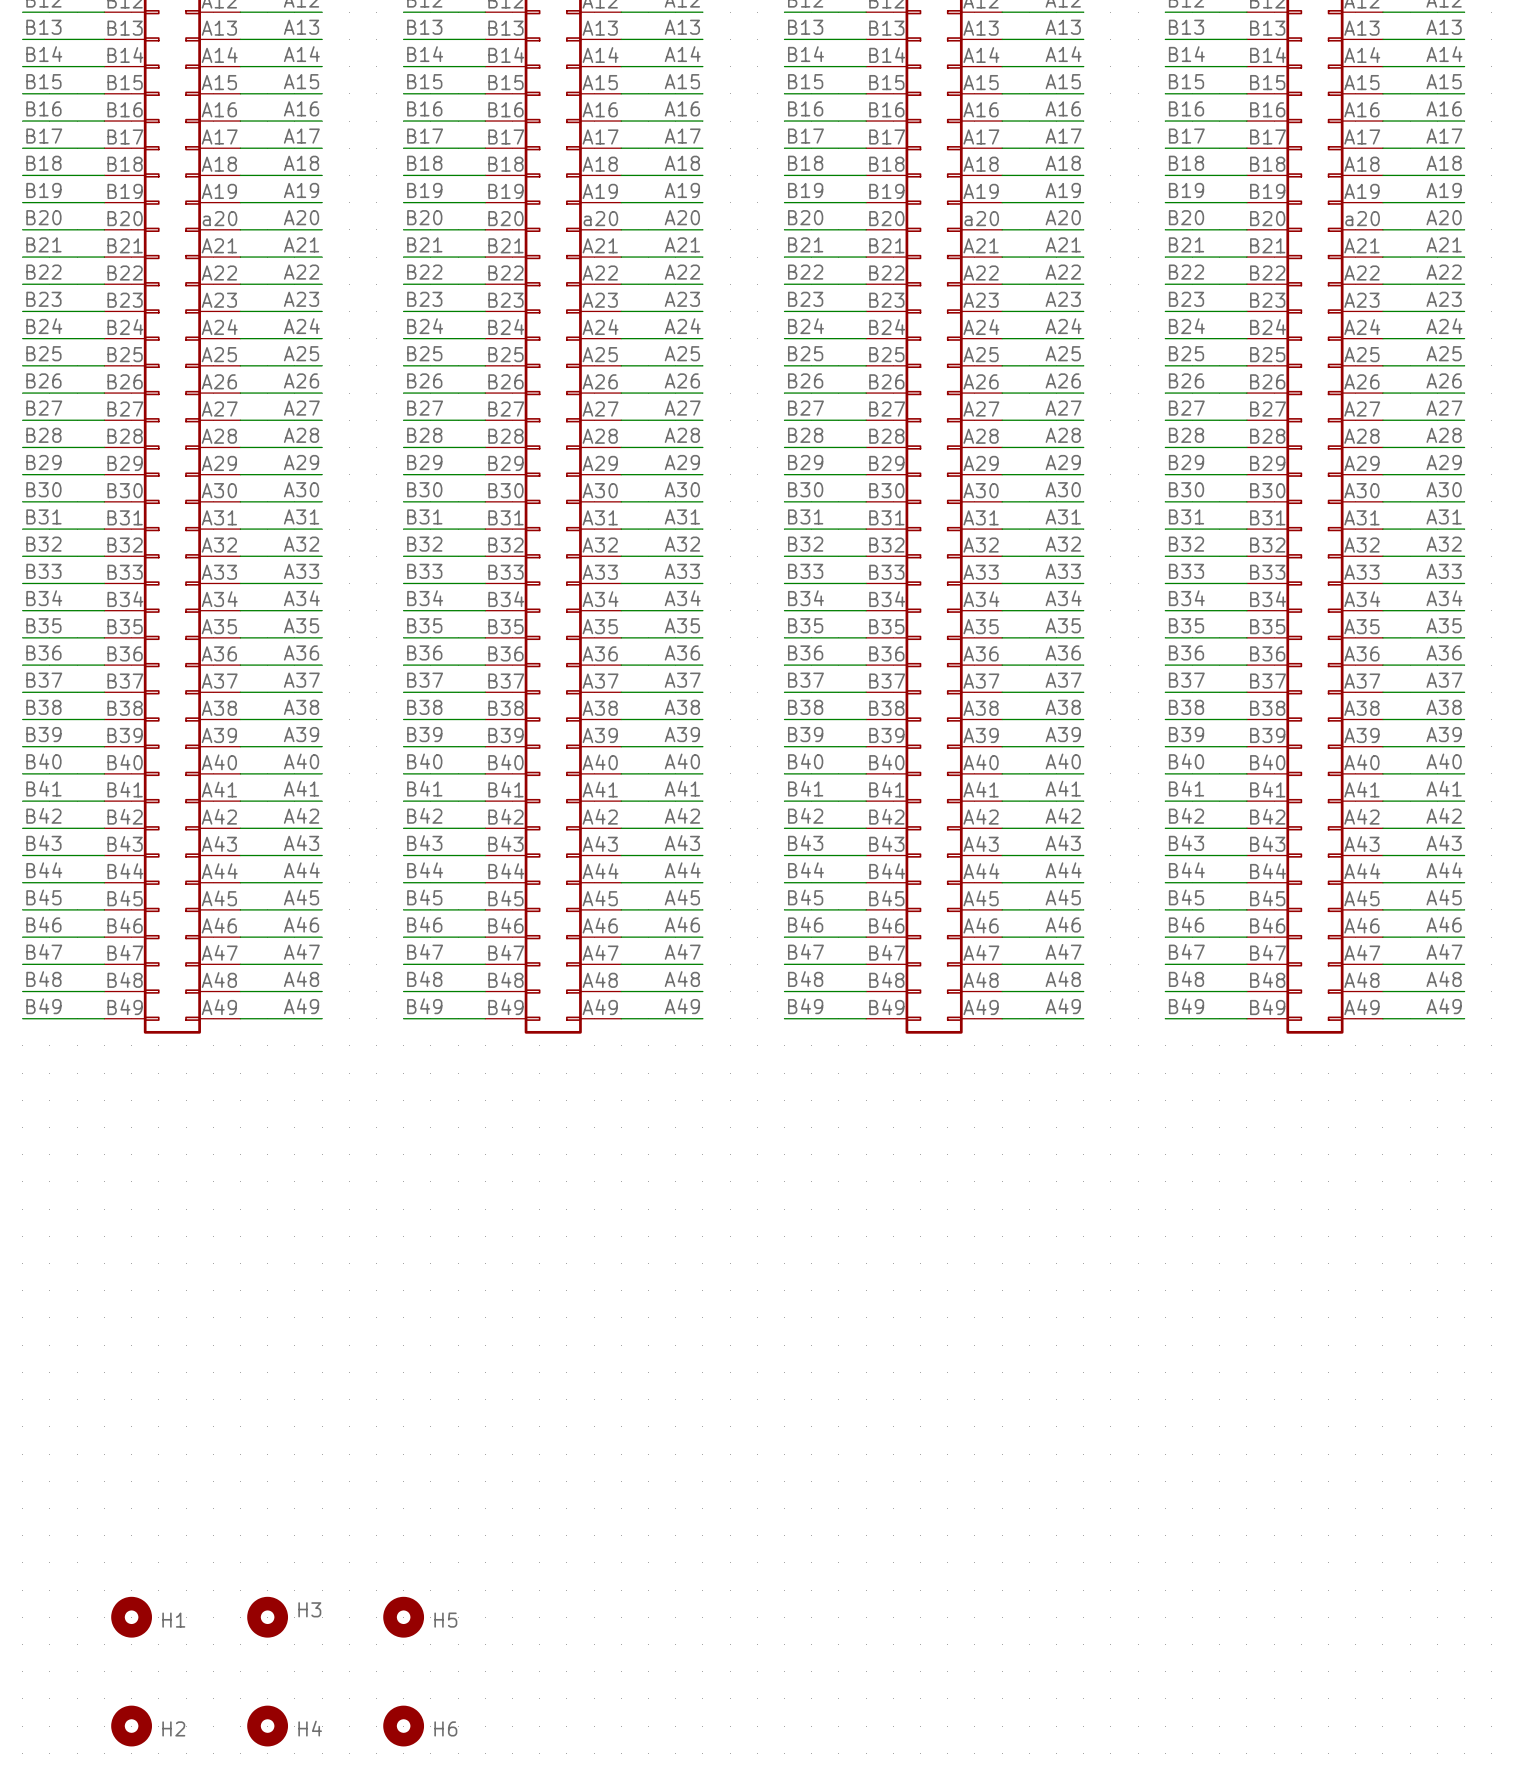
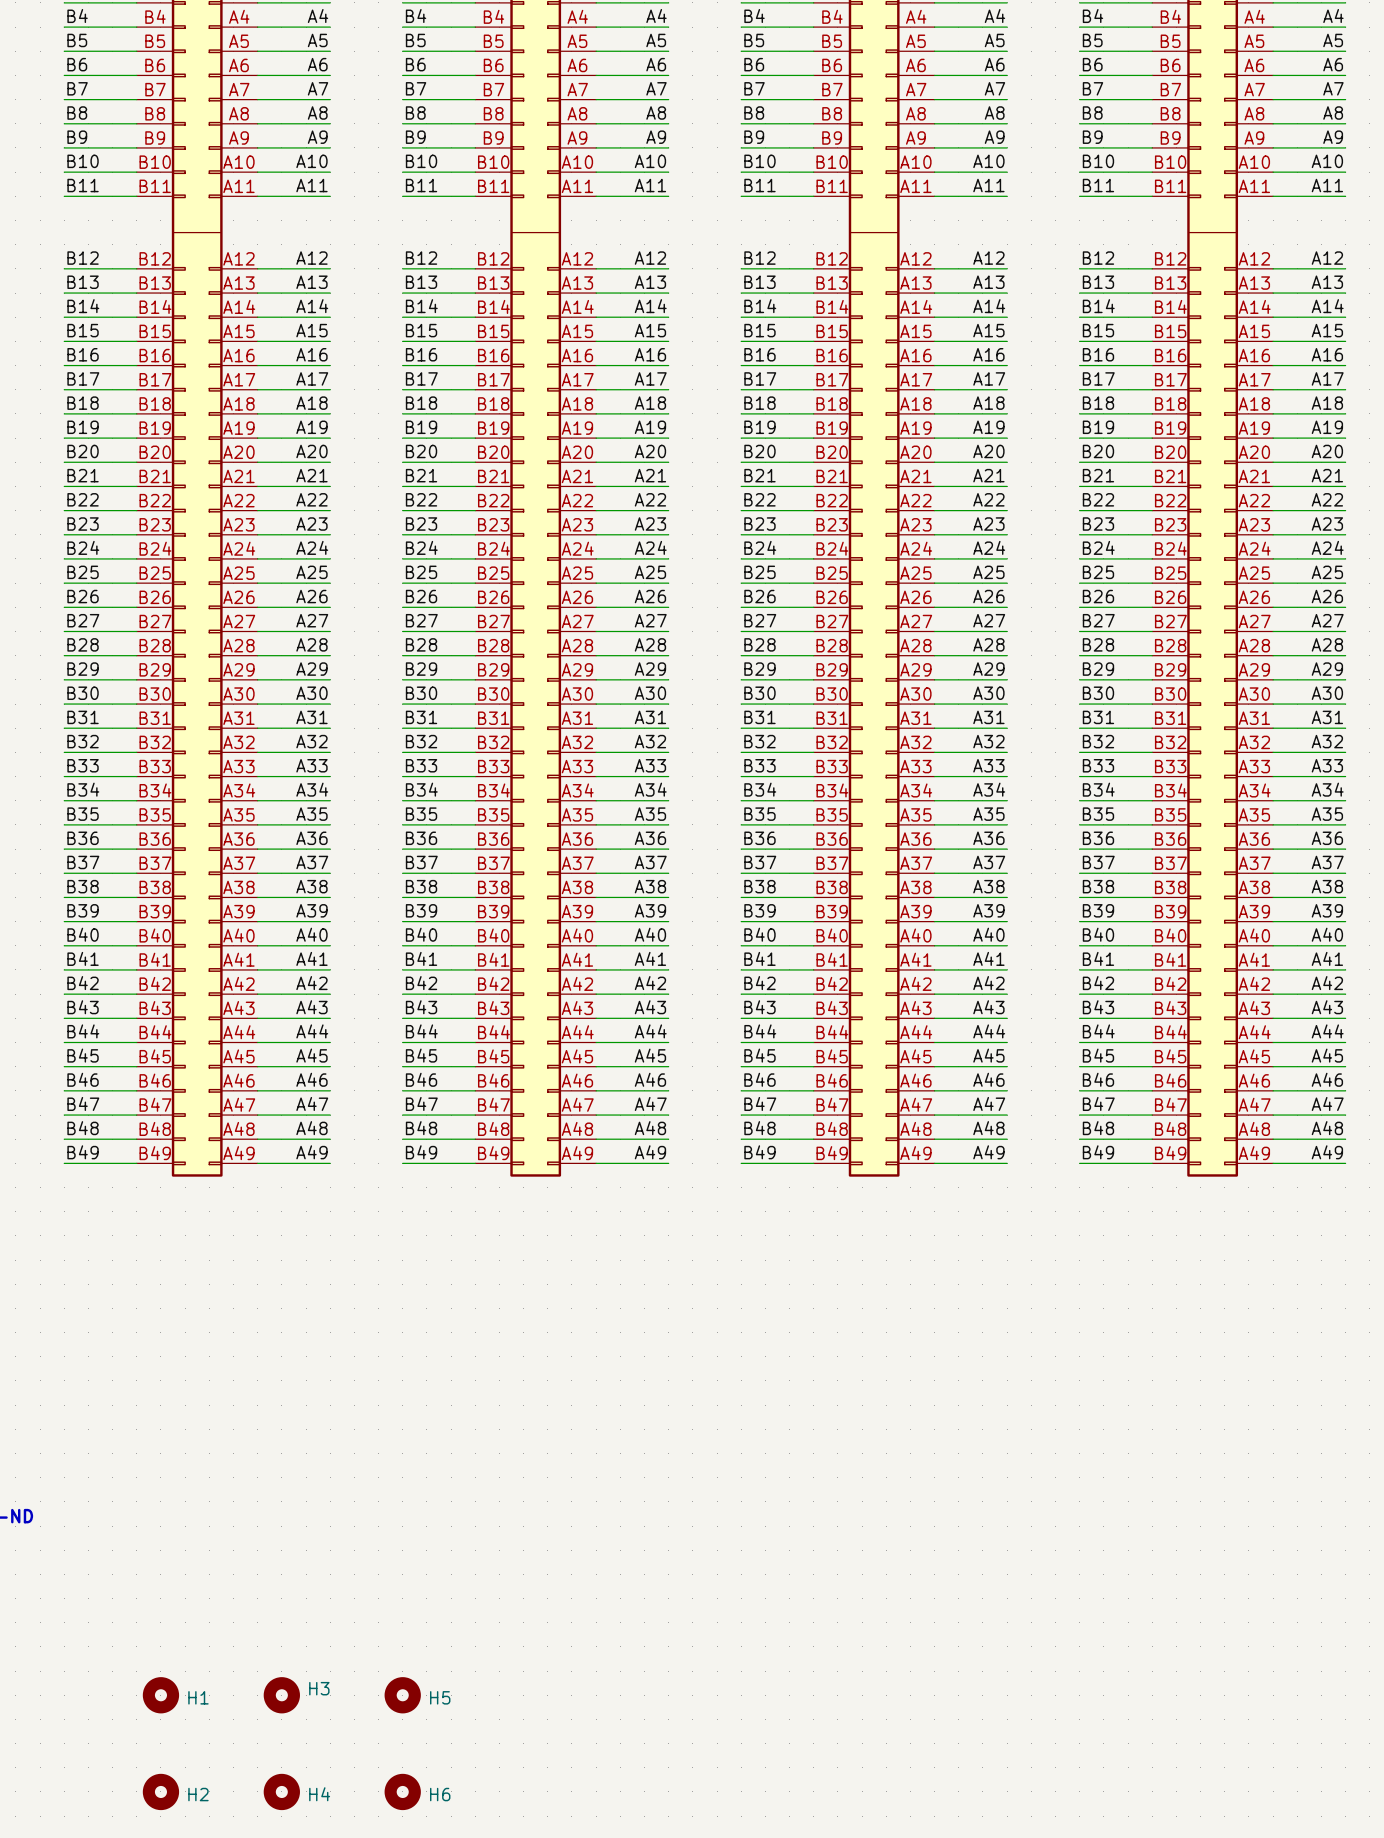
part pin number: a20 (220, 218) -> A20 (238, 452)
part pin number: a20 (600, 218) -> A20 (577, 452)
part pin number: a20 (981, 218) -> A20 (915, 452)
part pin number: a20 (1362, 218) -> A20 (1254, 452)

